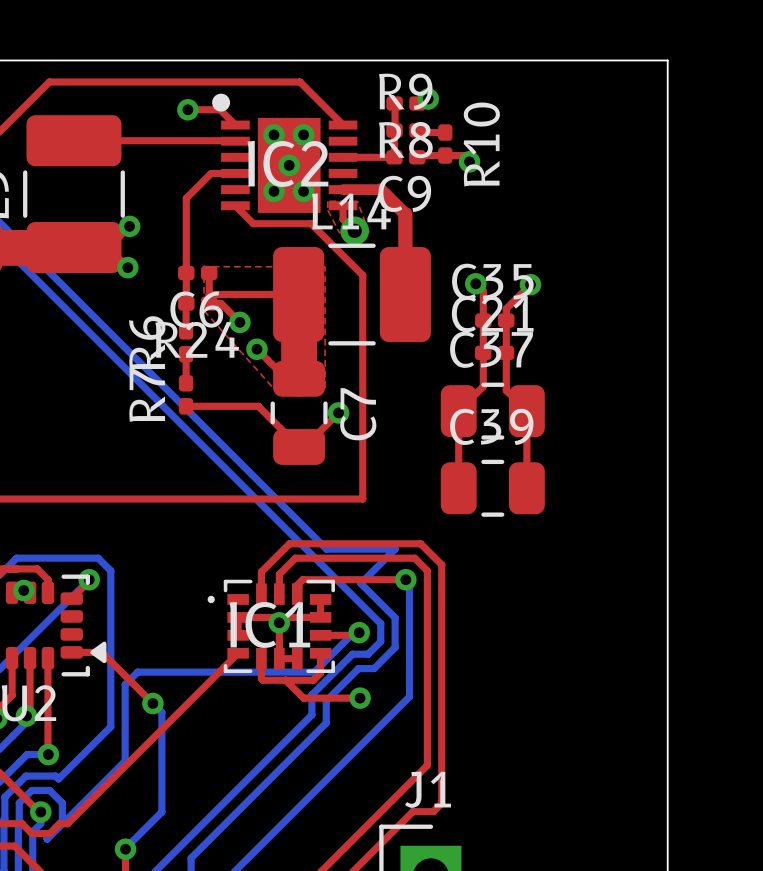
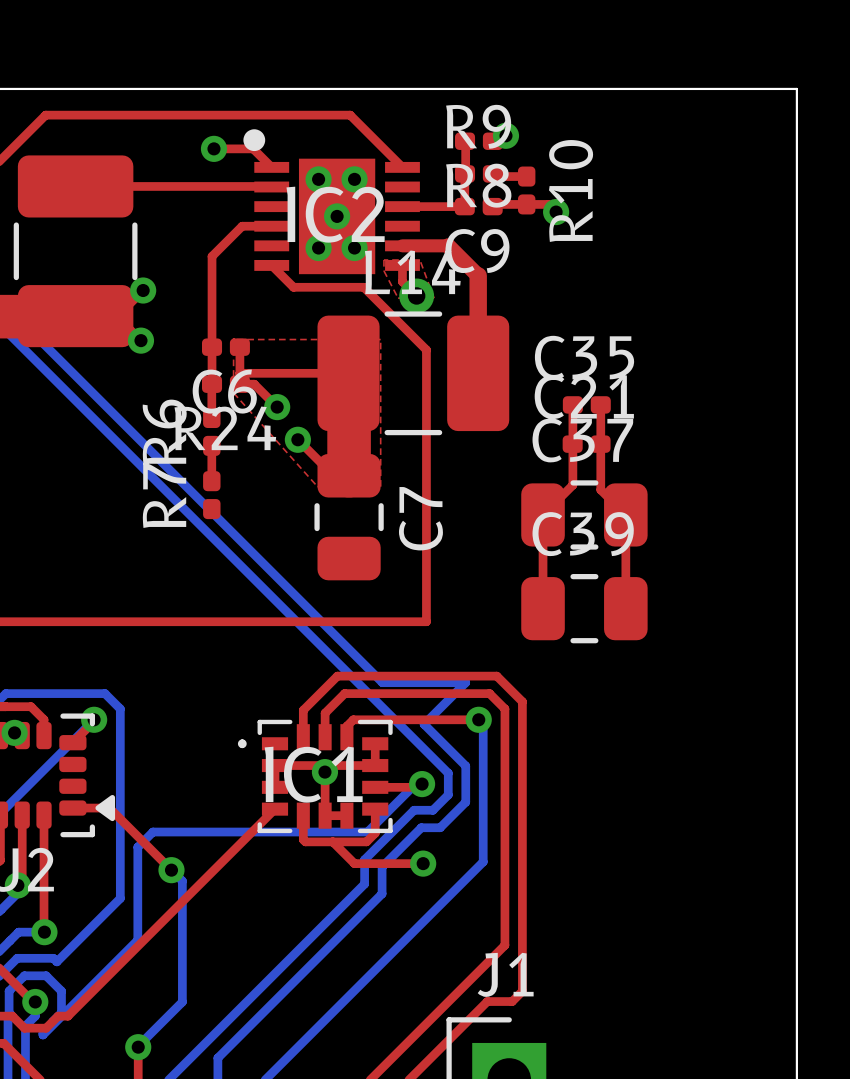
top track: (475, 283) (483, 291) (483, 320) -> none
via: (475, 283) -> none
top track: (530, 284) (506, 308) (506, 320) -> none
via: (530, 284) -> none
top track: (186, 406) (258, 406) (299, 447) (304, 447) (338, 412) -> none
via: (338, 412) -> none

